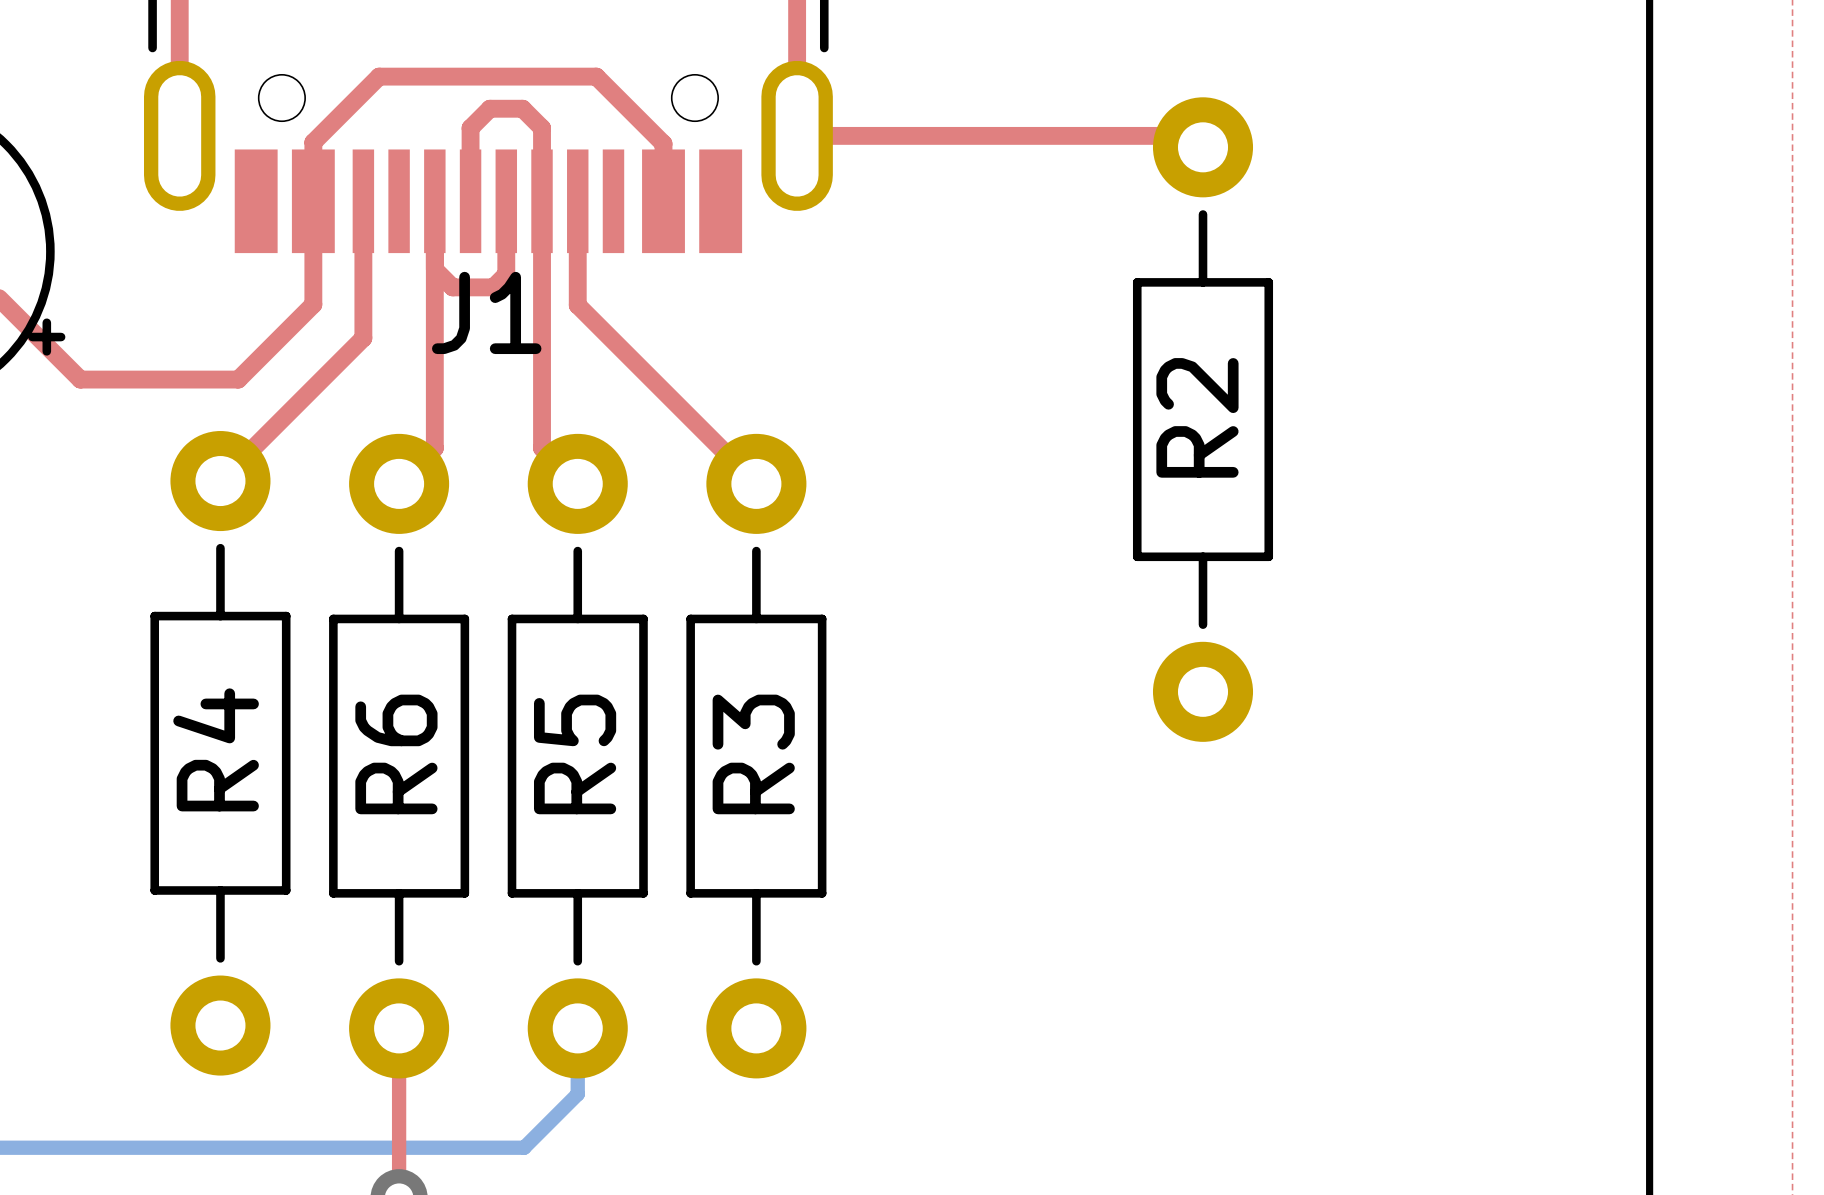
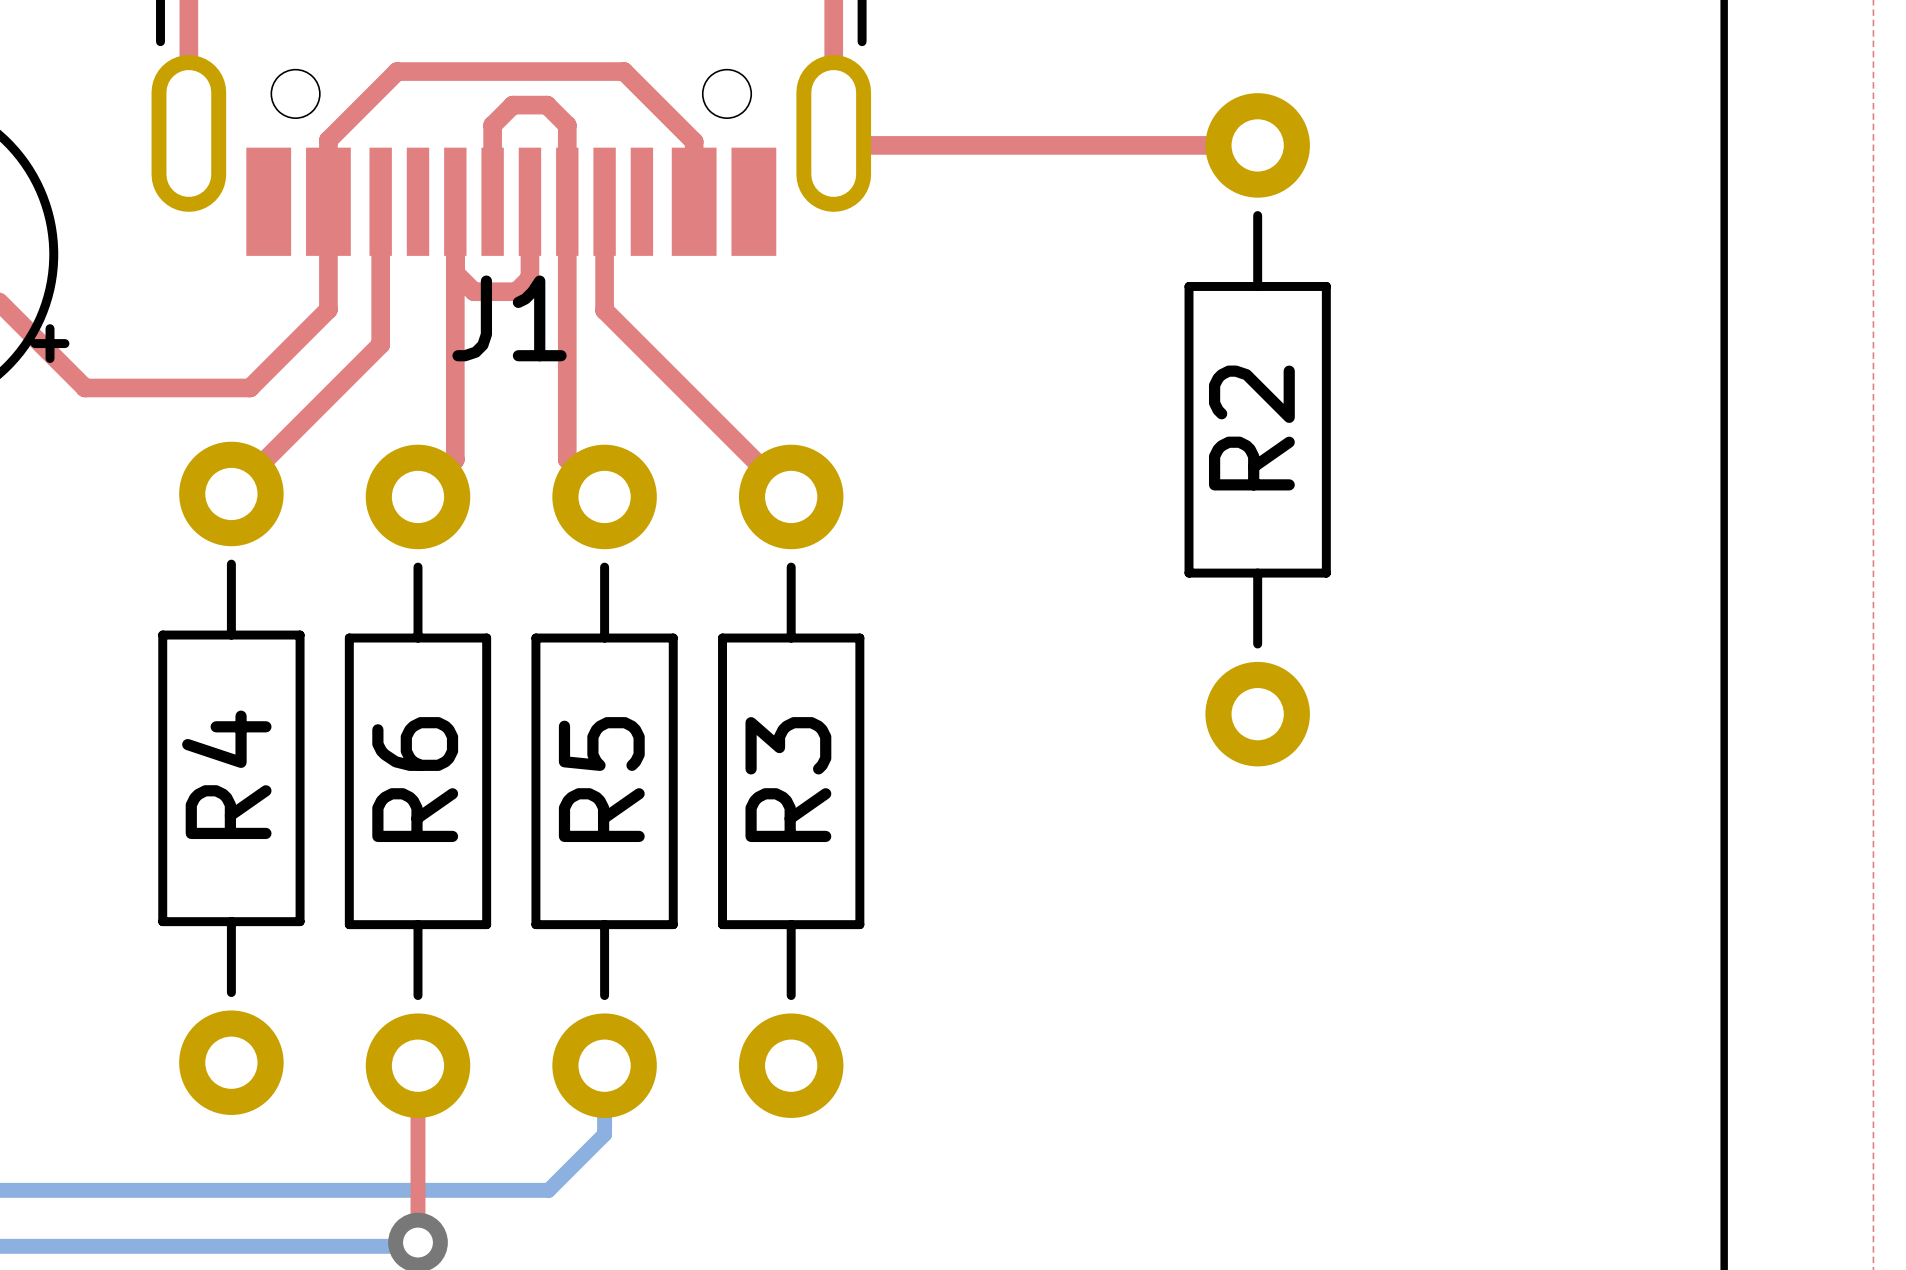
top track: (797, 135) (1191, 135) -> (845, 145) (1257, 145)

